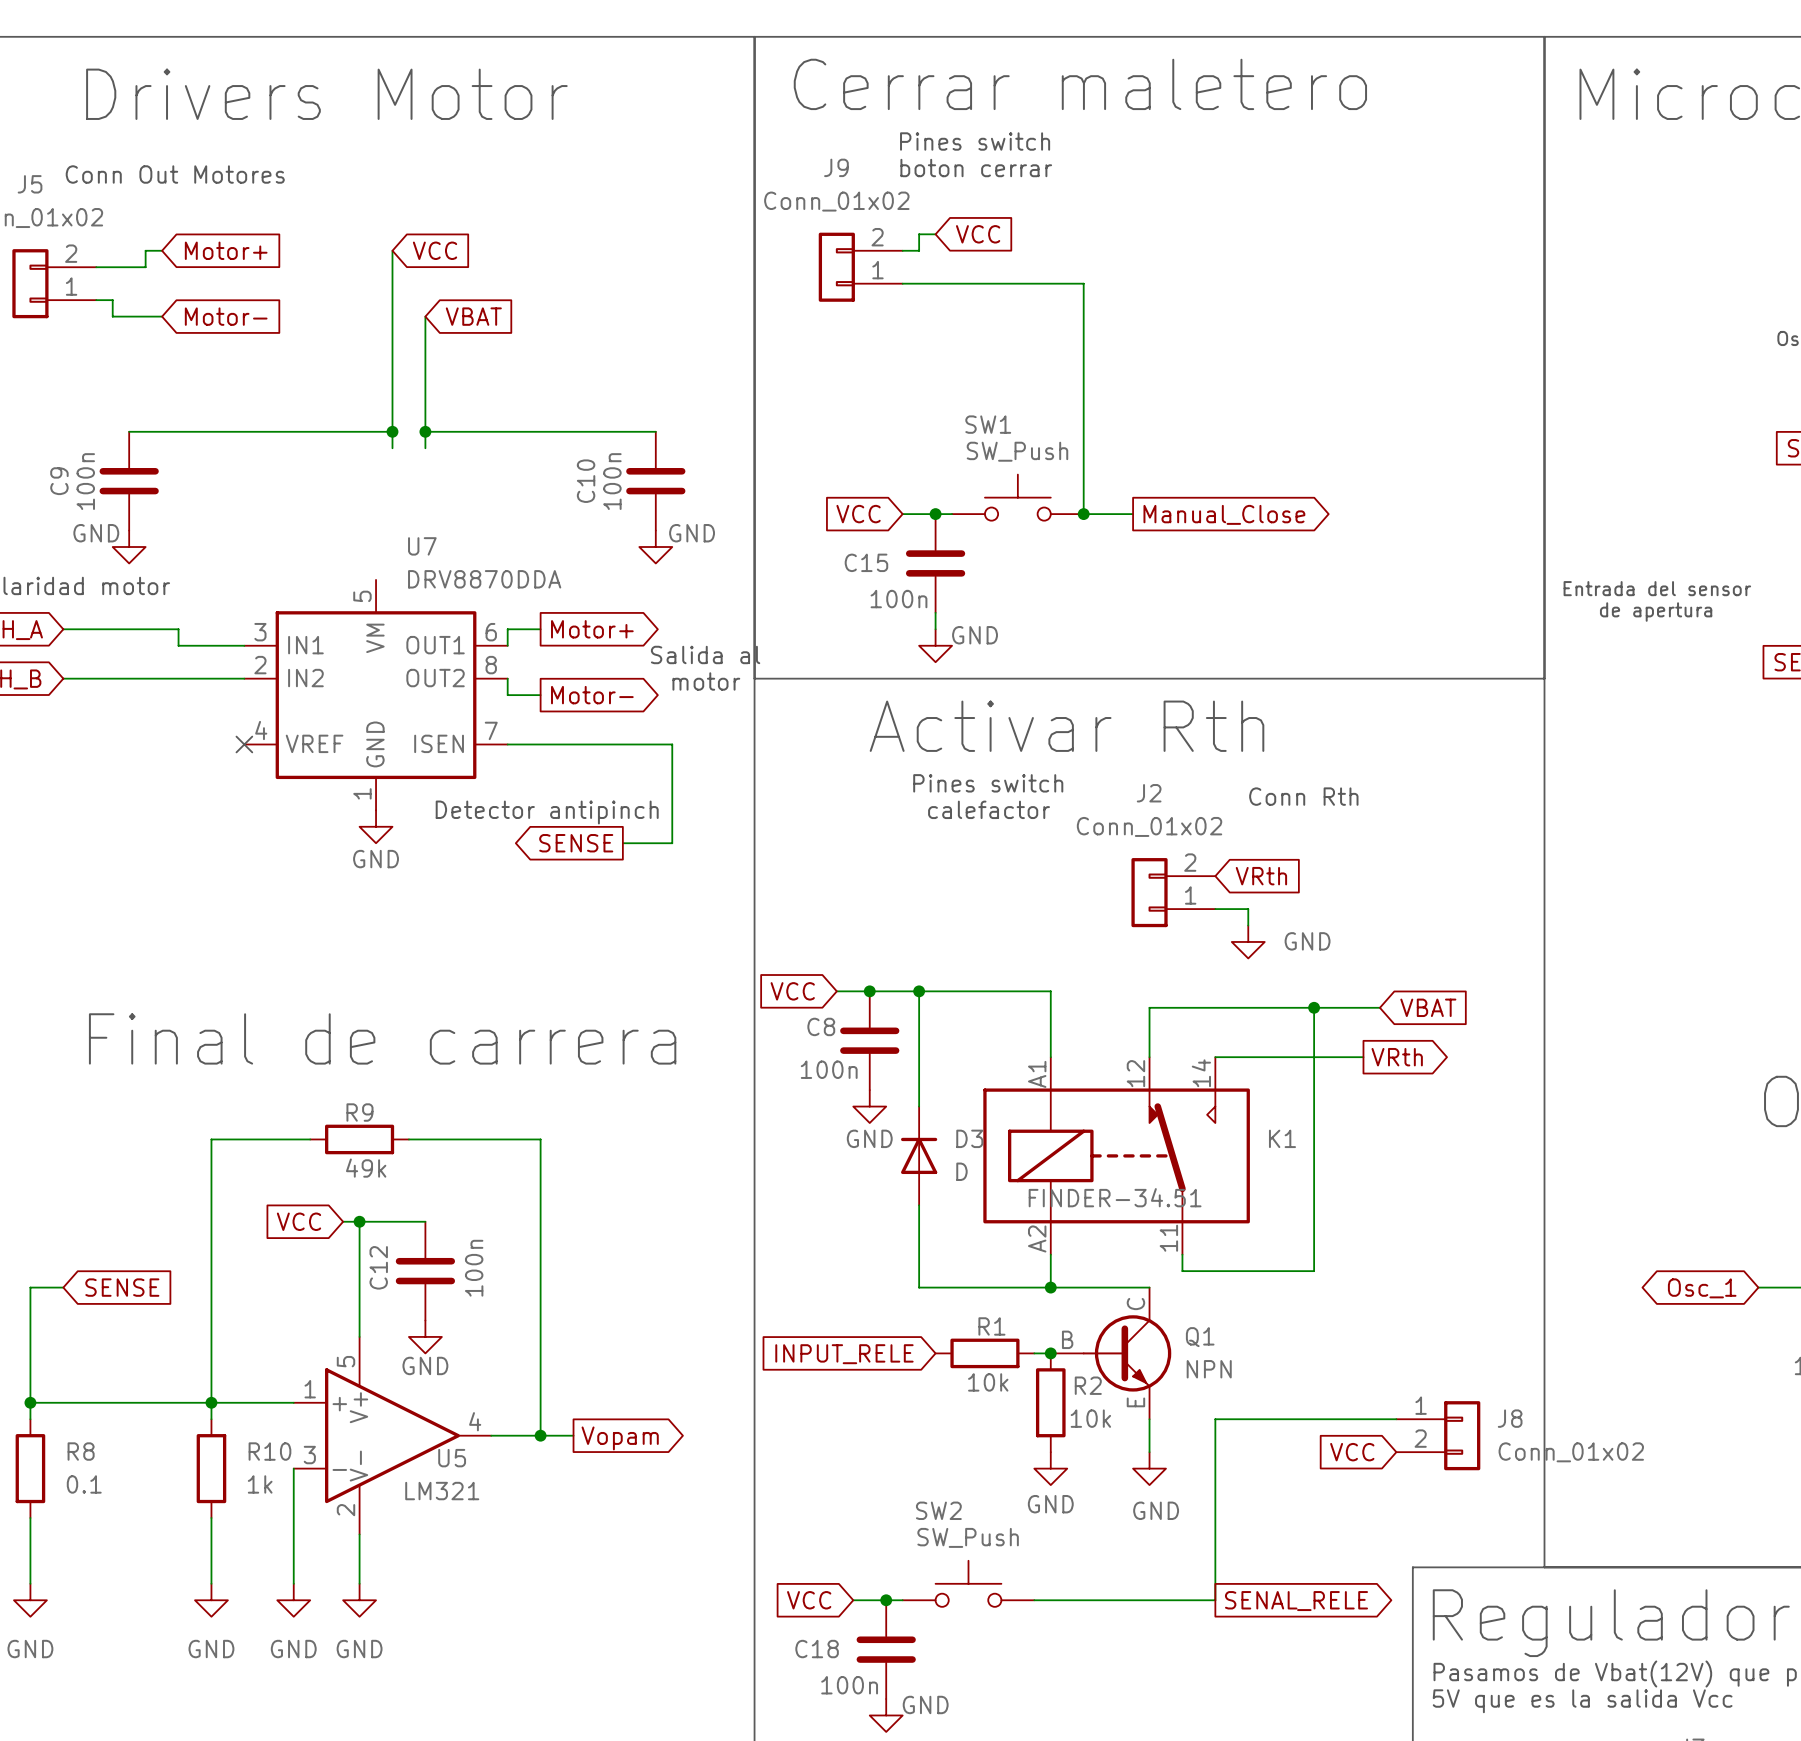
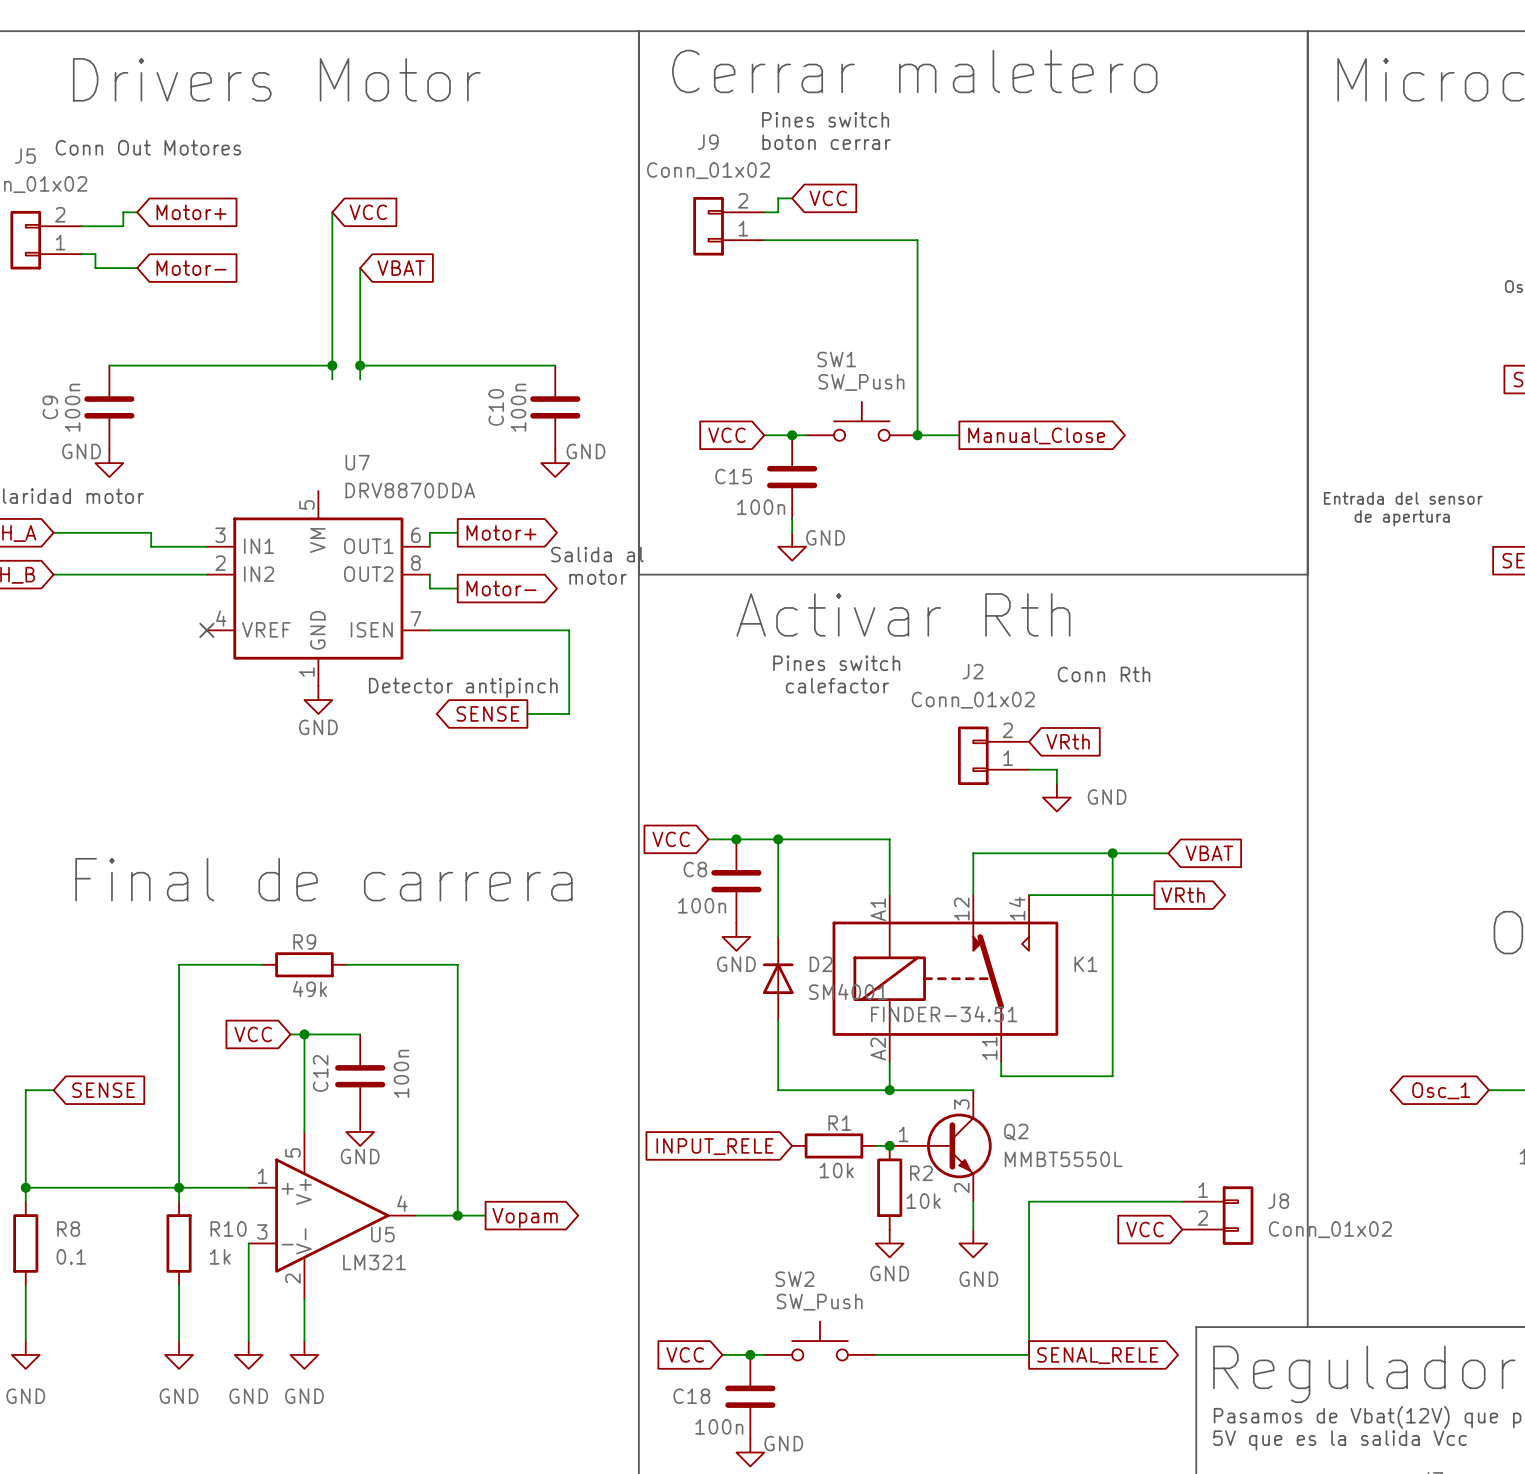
D3 name: D3 (969, 1138) -> D2 (821, 964)
D3 value: D (961, 1171) -> SM4001 (848, 991)
Q1: NPN (1111, 1353) -> none
Q2: none -> MMBT5550L (940, 1145)

